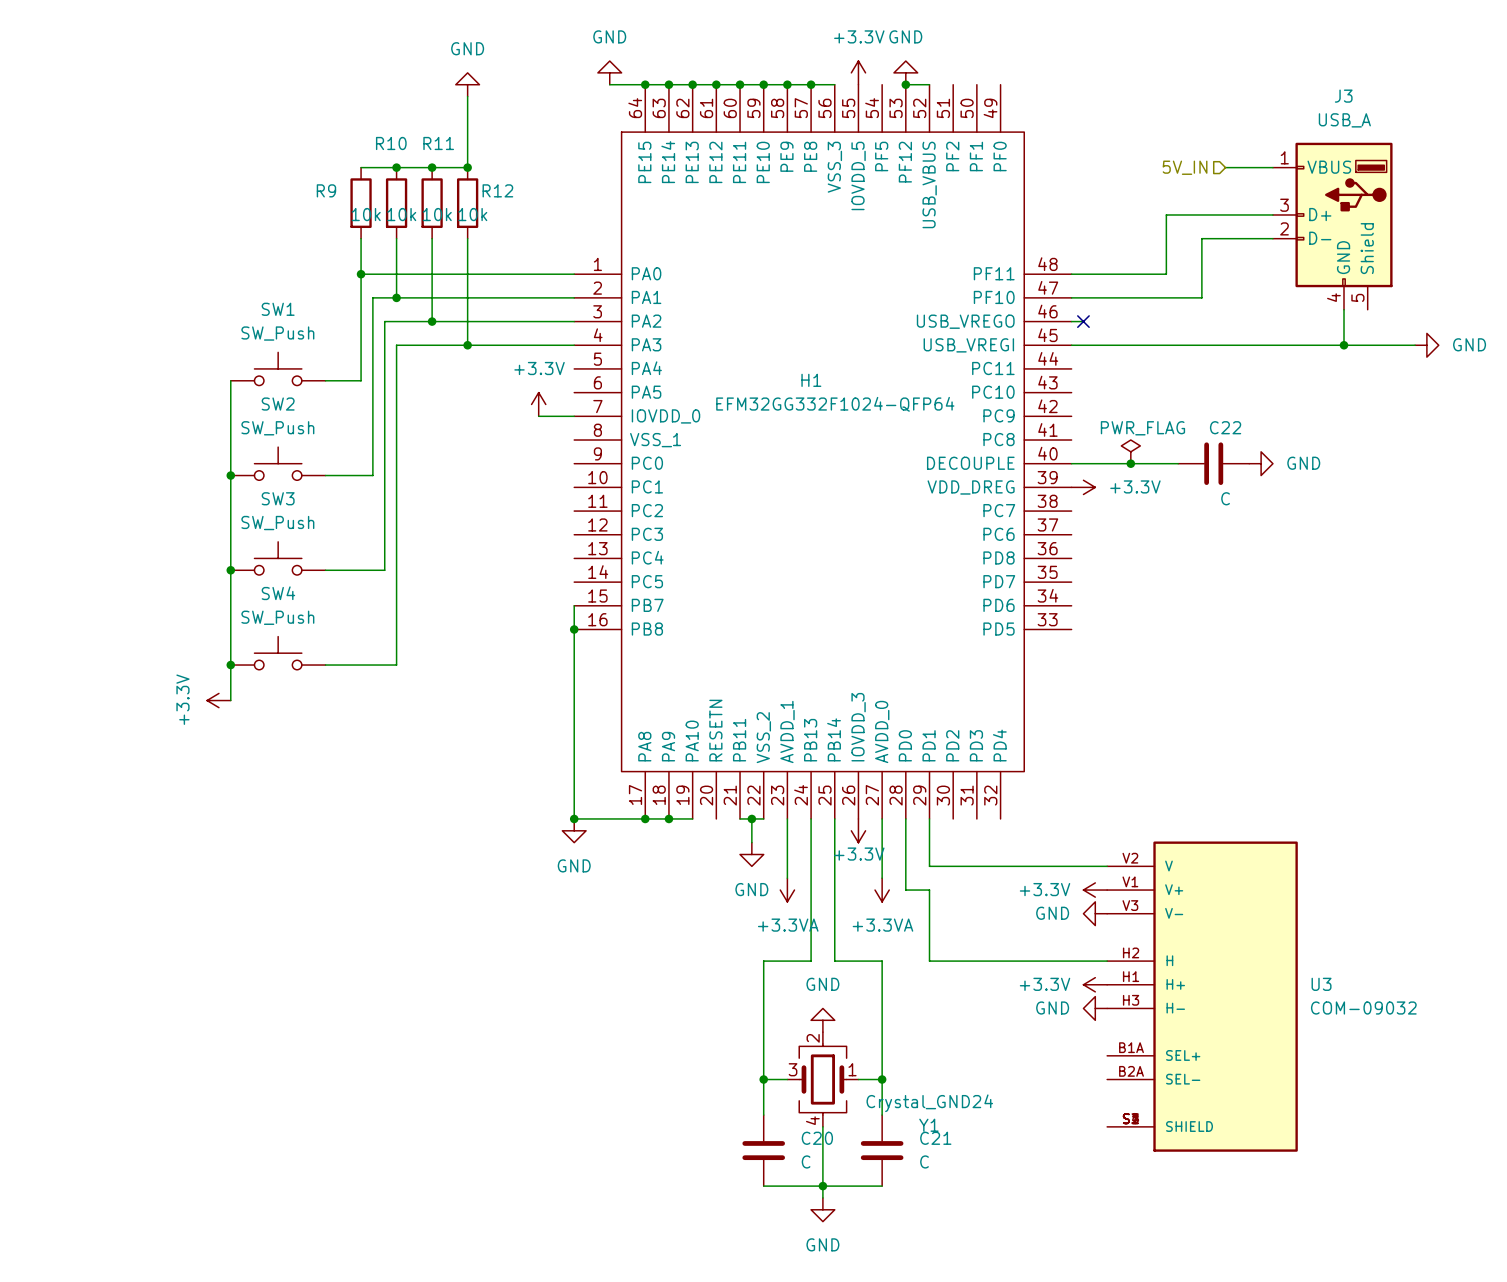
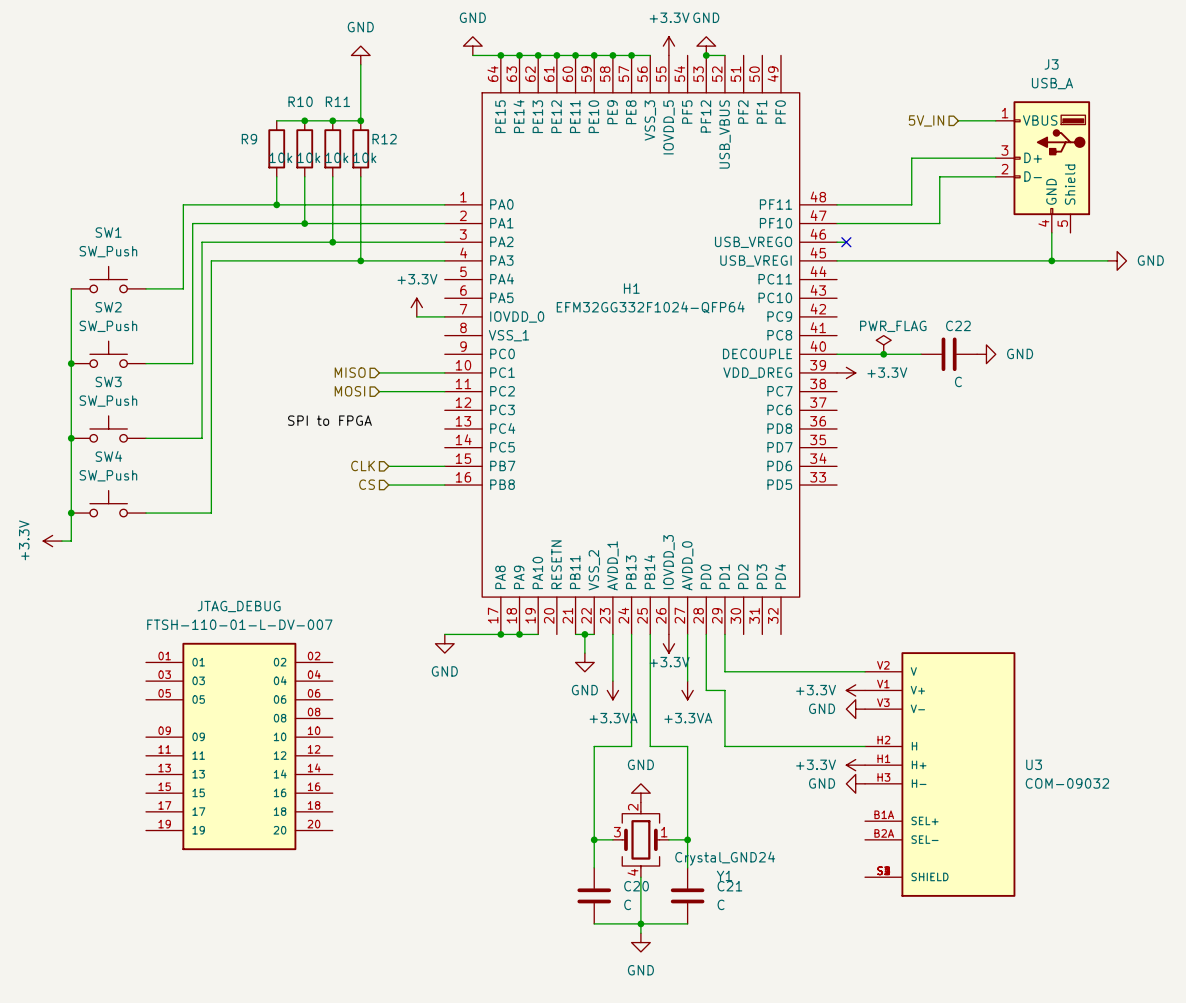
wire: (361, 274) (361, 380) (325, 380) -> (276, 204) (183, 204) (183, 288) (145, 288)
wire: (372, 297) (372, 475) (325, 475) -> (286, 223) (192, 223) (192, 363) (145, 363)
wire: (384, 321) (384, 570) (325, 570) -> (295, 242) (202, 242) (202, 438) (145, 438)
wire: (396, 345) (396, 665) (325, 665) -> (304, 260) (211, 260) (211, 513) (145, 513)
SW1 position: (278, 368) -> (108, 279)
wire: none -> (71, 288) (71, 541) (61, 541)
wire: (230, 380) (230, 700) -> none
SW2 position: (278, 463) -> (108, 354)
junction: none -> (71, 363)
junction: (230, 475) -> none
hierarchical label: none -> MISO (350, 372)
wire: none -> (379, 372) (444, 372)
hierarchical label: none -> MOSI (349, 391)
wire: none -> (379, 391) (444, 391)
label: none -> SPI to FPGA (329, 420)
SW3 position: (278, 558) -> (108, 428)
junction: none -> (71, 438)
junction: (230, 570) -> none
hierarchical label: none -> CLK (363, 465)
wire: (574, 605) (574, 818) -> (444, 466) (388, 466)
hierarchical label: none -> CS (367, 484)
wire: none -> (388, 485) (444, 485)
junction: (574, 629) -> none
SW4 position: (278, 653) -> (108, 503)
junction: none -> (71, 513)
junction: (230, 665) -> none
power symbol position: +3.3V (218, 700) -> +3.3V (52, 541)
junction: (574, 818) -> none
JTAG_DEBUG: none -> FTSH-110-01-L-DV-007 (239, 746)

